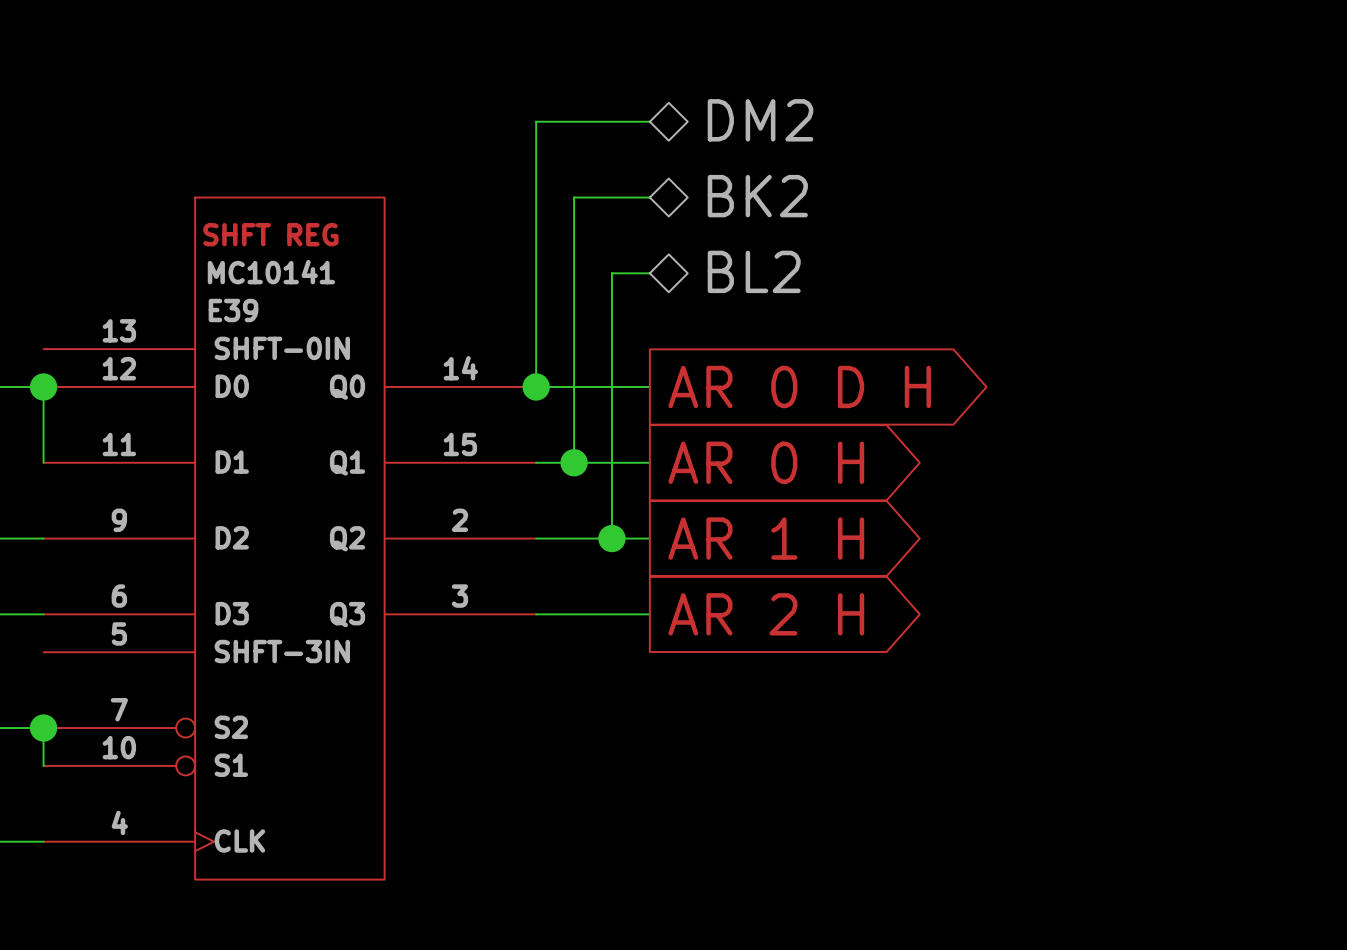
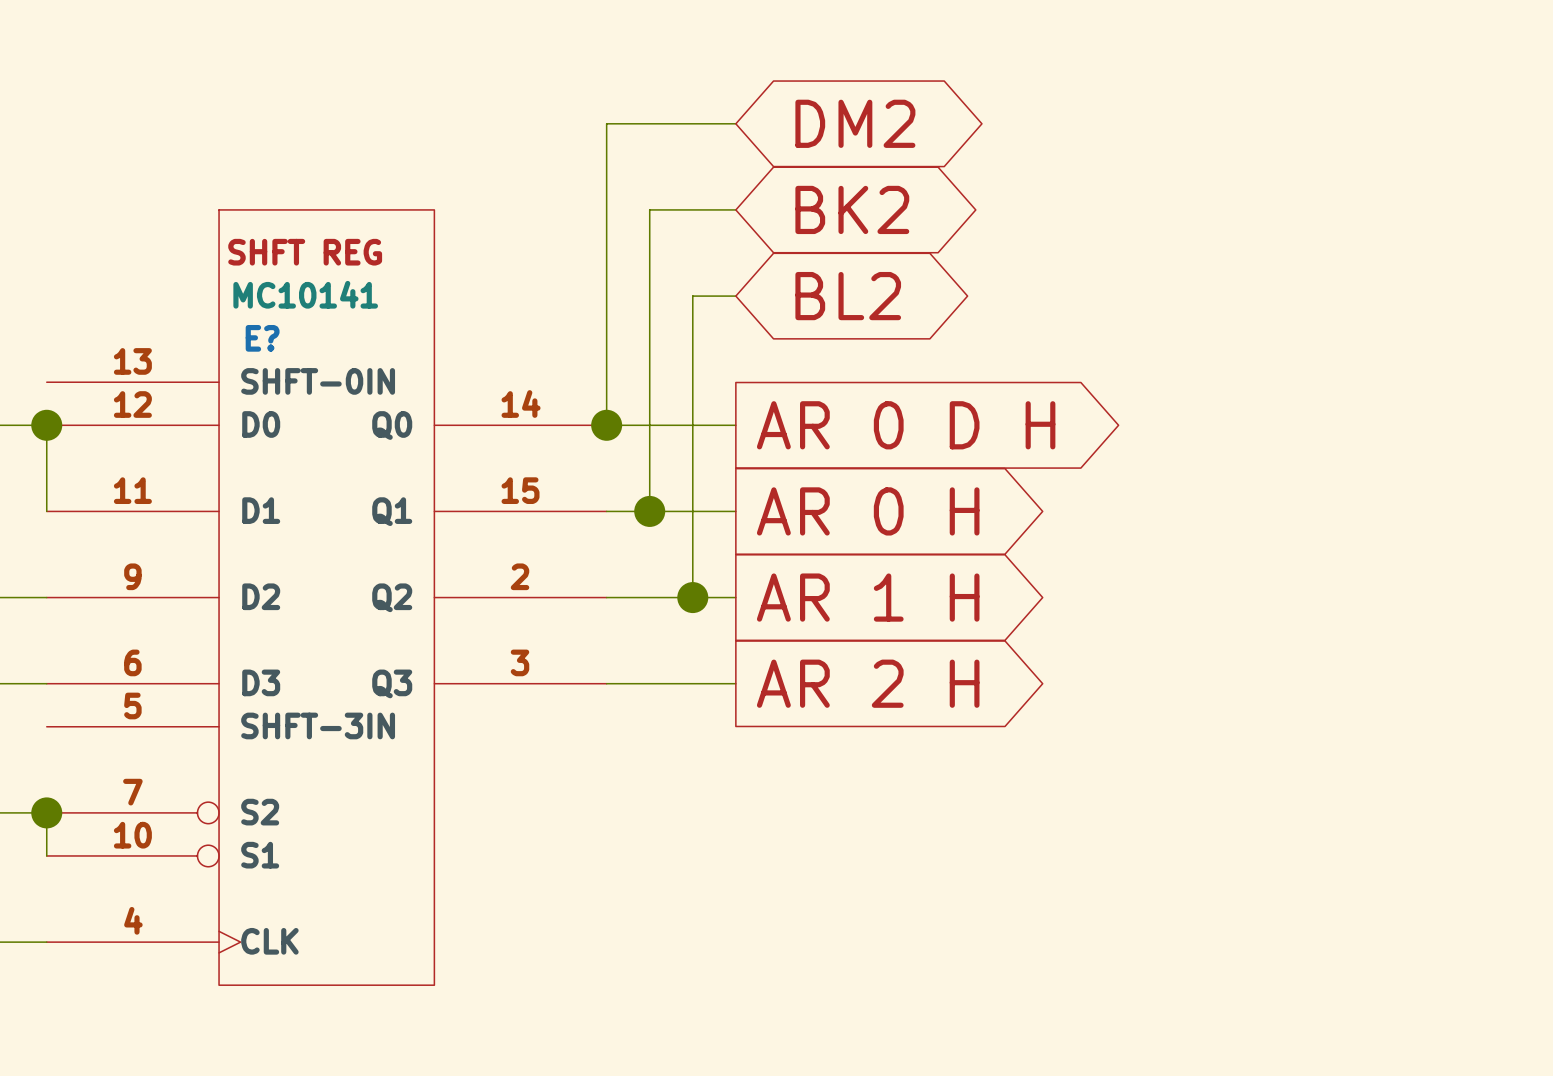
hierarchical label: DM2 (760, 120) -> none
global label: none -> DM2 (855, 123)
hierarchical label: BK2 (757, 196) -> none
global label: none -> BK2 (852, 209)
hierarchical label: BL2 (754, 271) -> none
global label: none -> BL2 (848, 296)
E39 name: E39 (233, 310) -> E? (262, 338)

